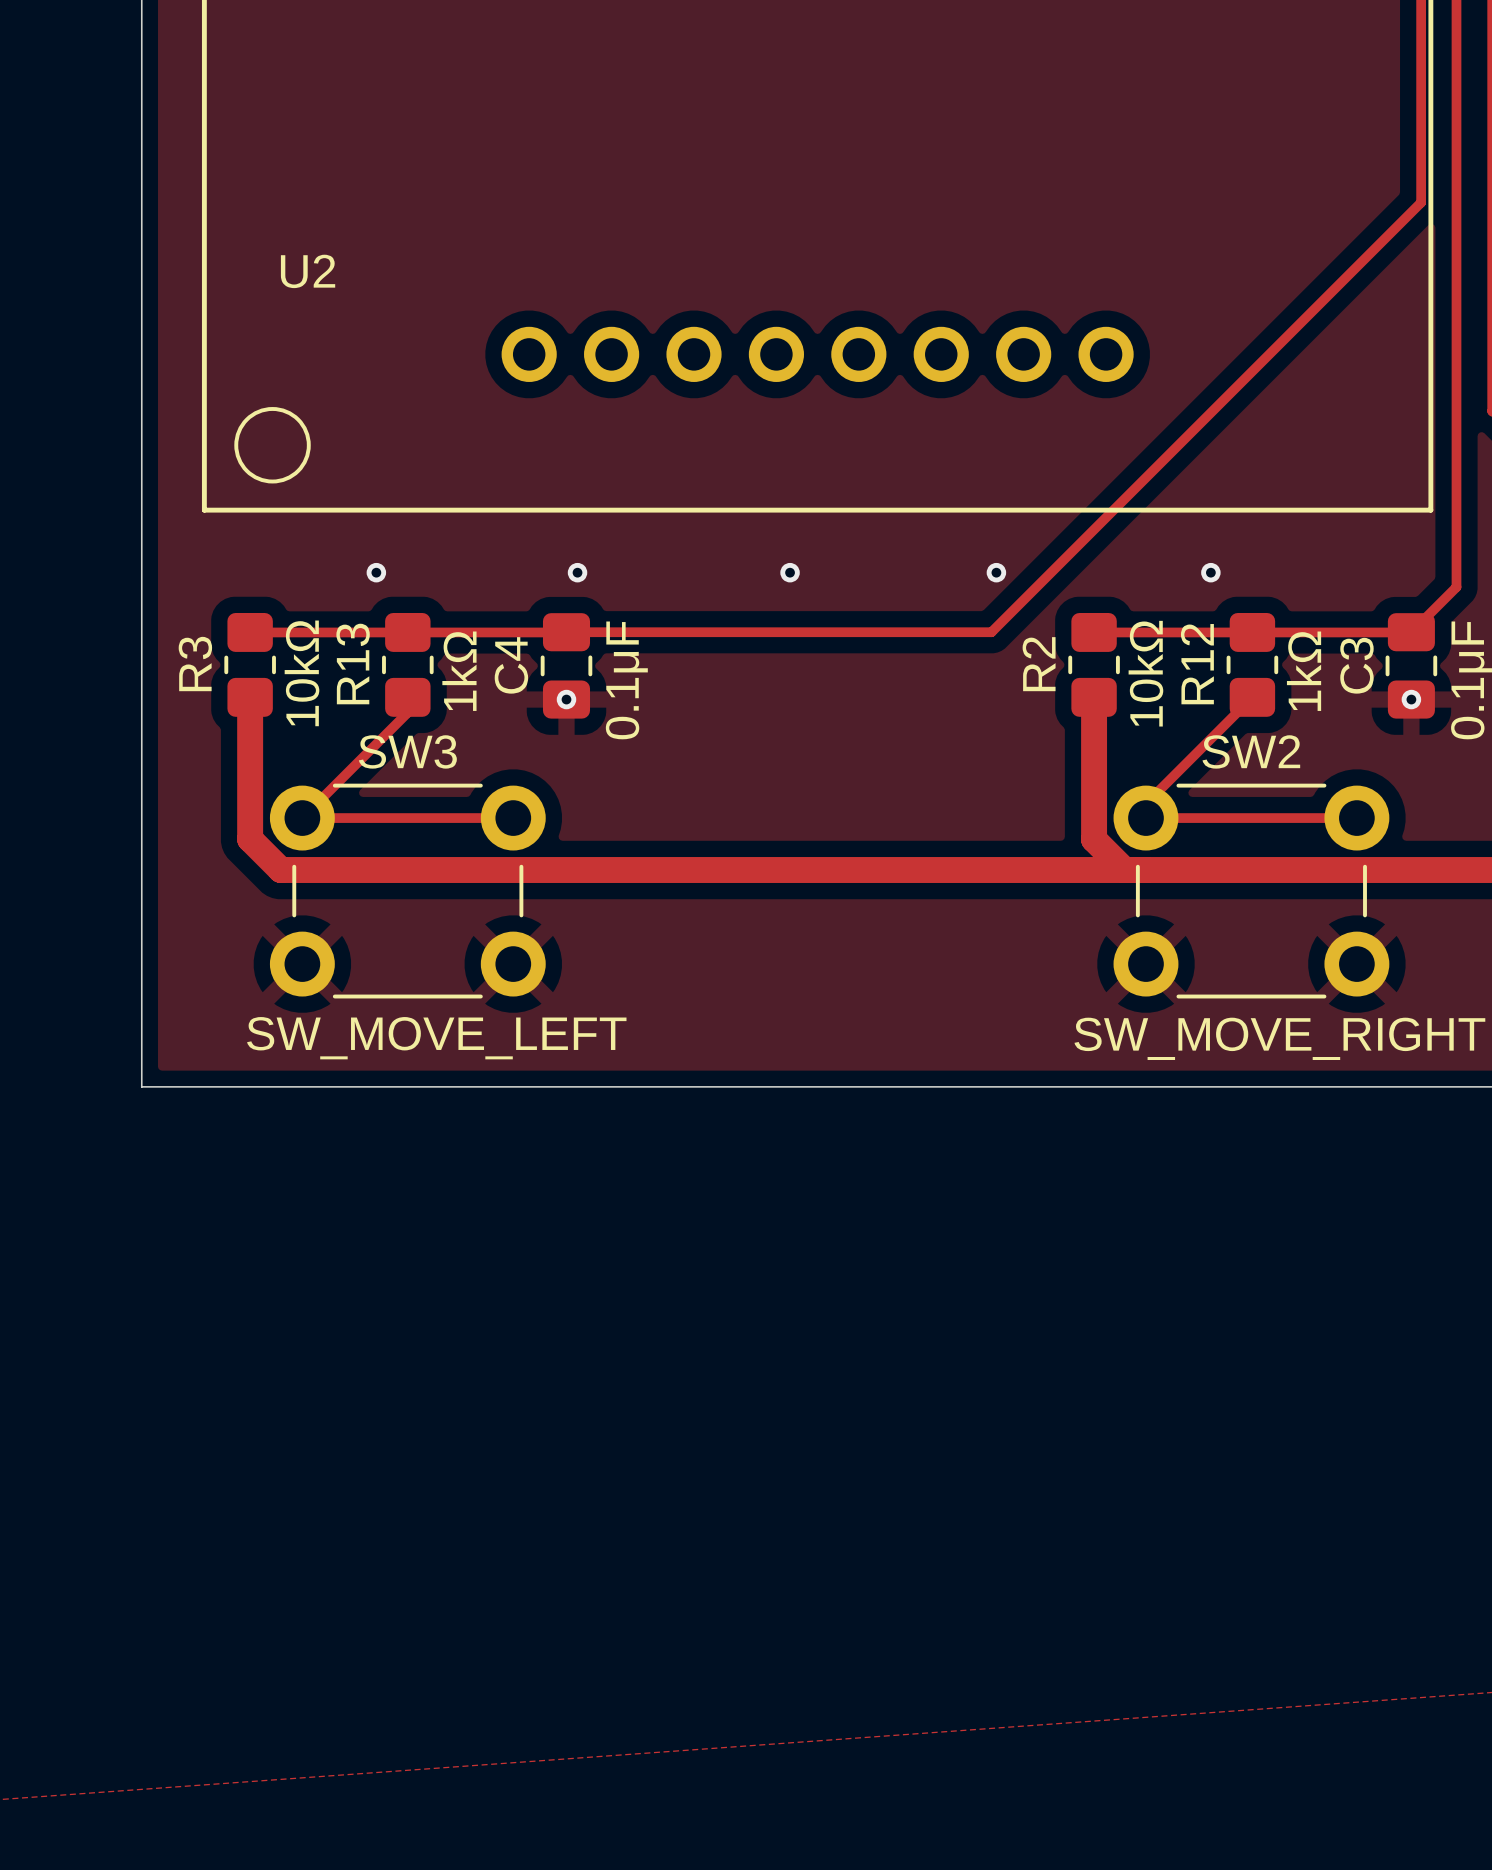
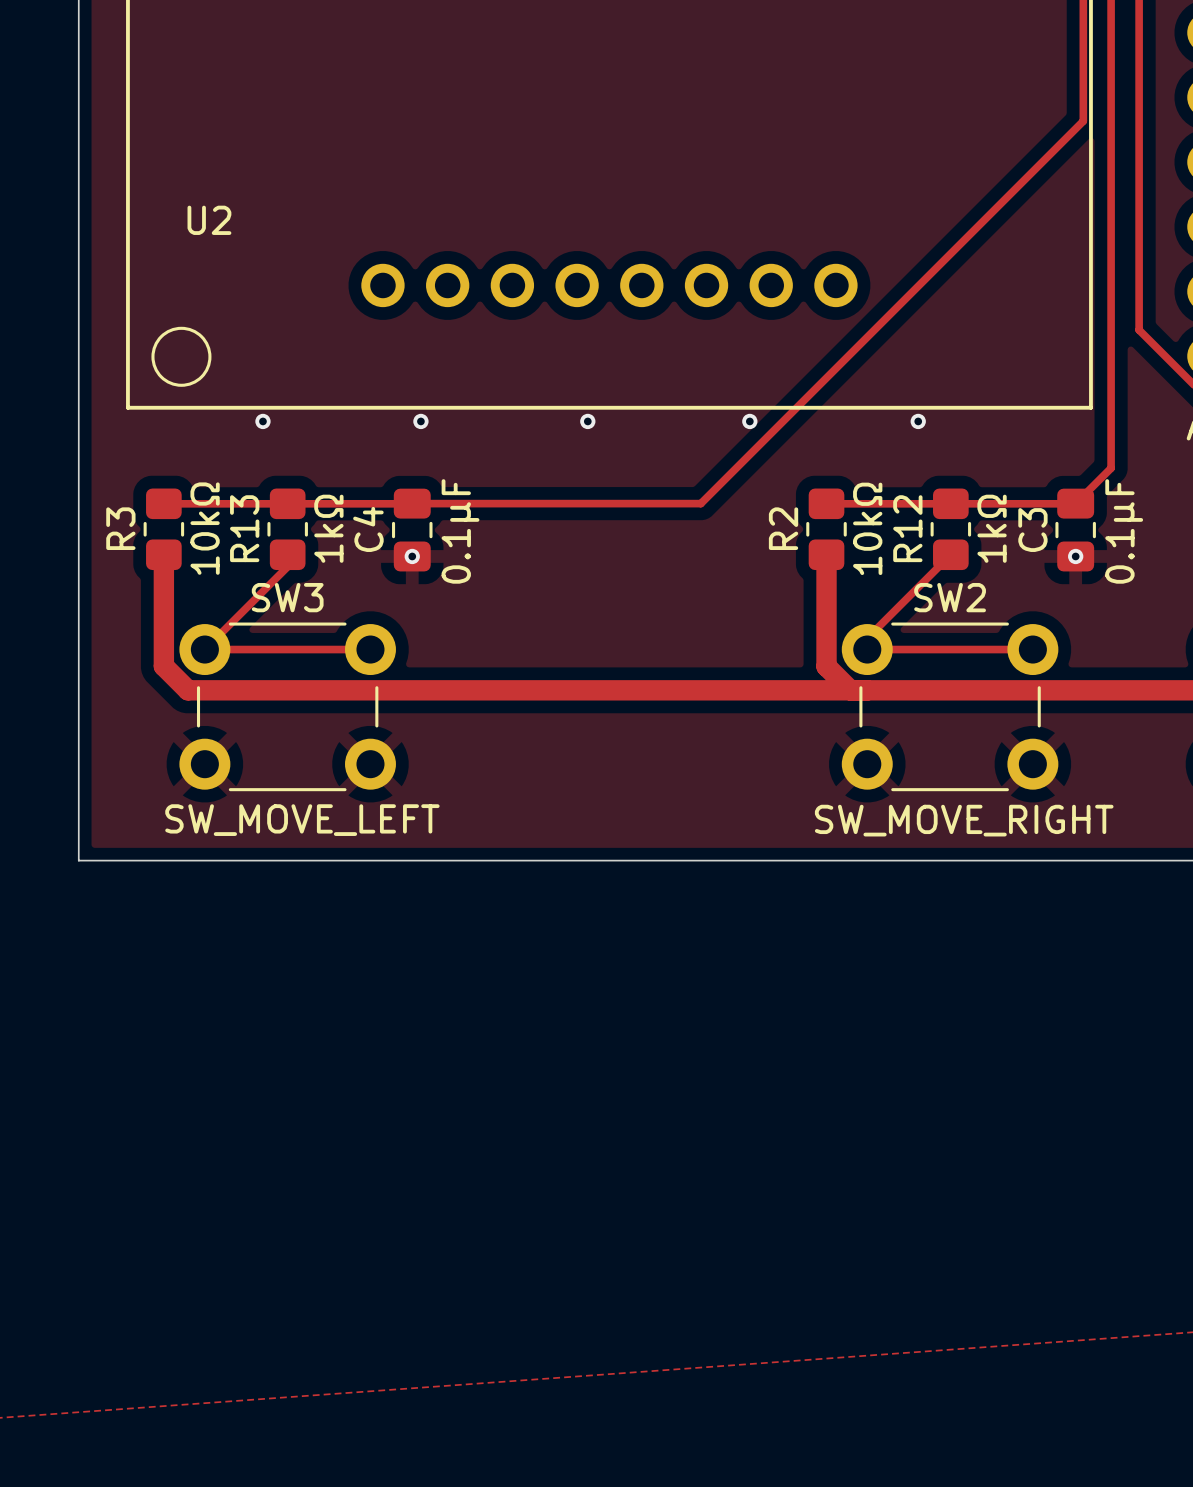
track: (1421, 145) (1421, 202) (991, 632) (934, 632) -> (1083, 121) (700, 503)
via position: (376, 572) -> (262, 421)
via position: (577, 572) -> (420, 421)
via position: (790, 572) -> (587, 421)
via position: (996, 572) -> (749, 421)
via position: (1210, 572) -> (918, 421)

